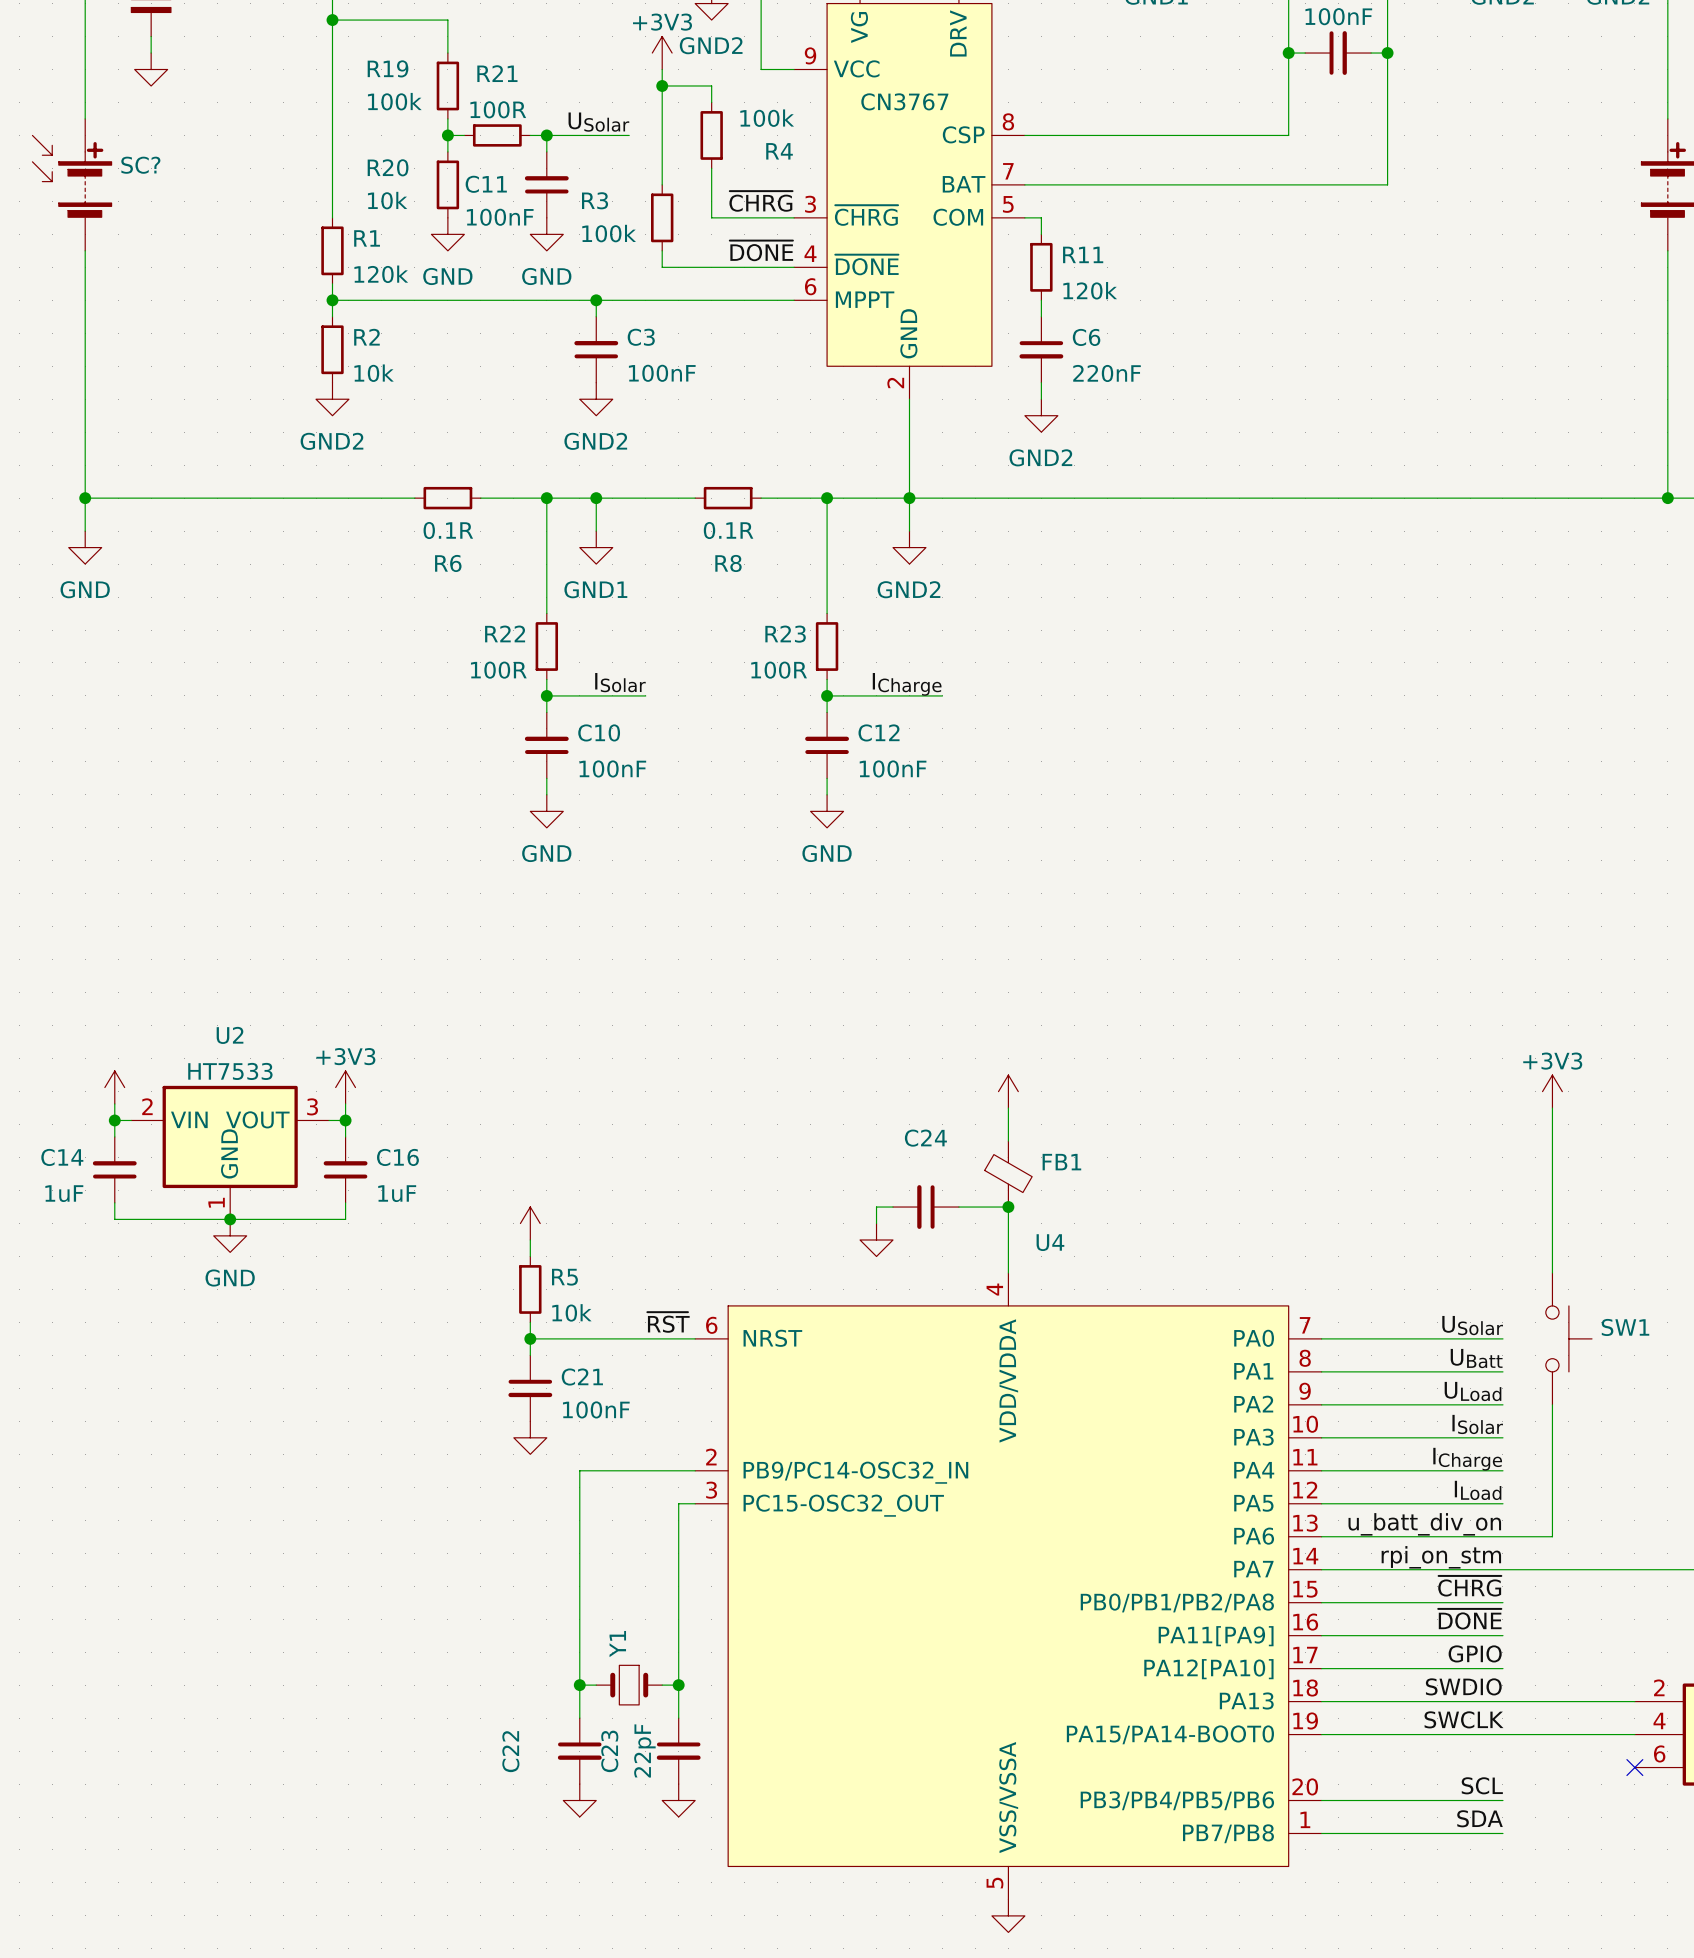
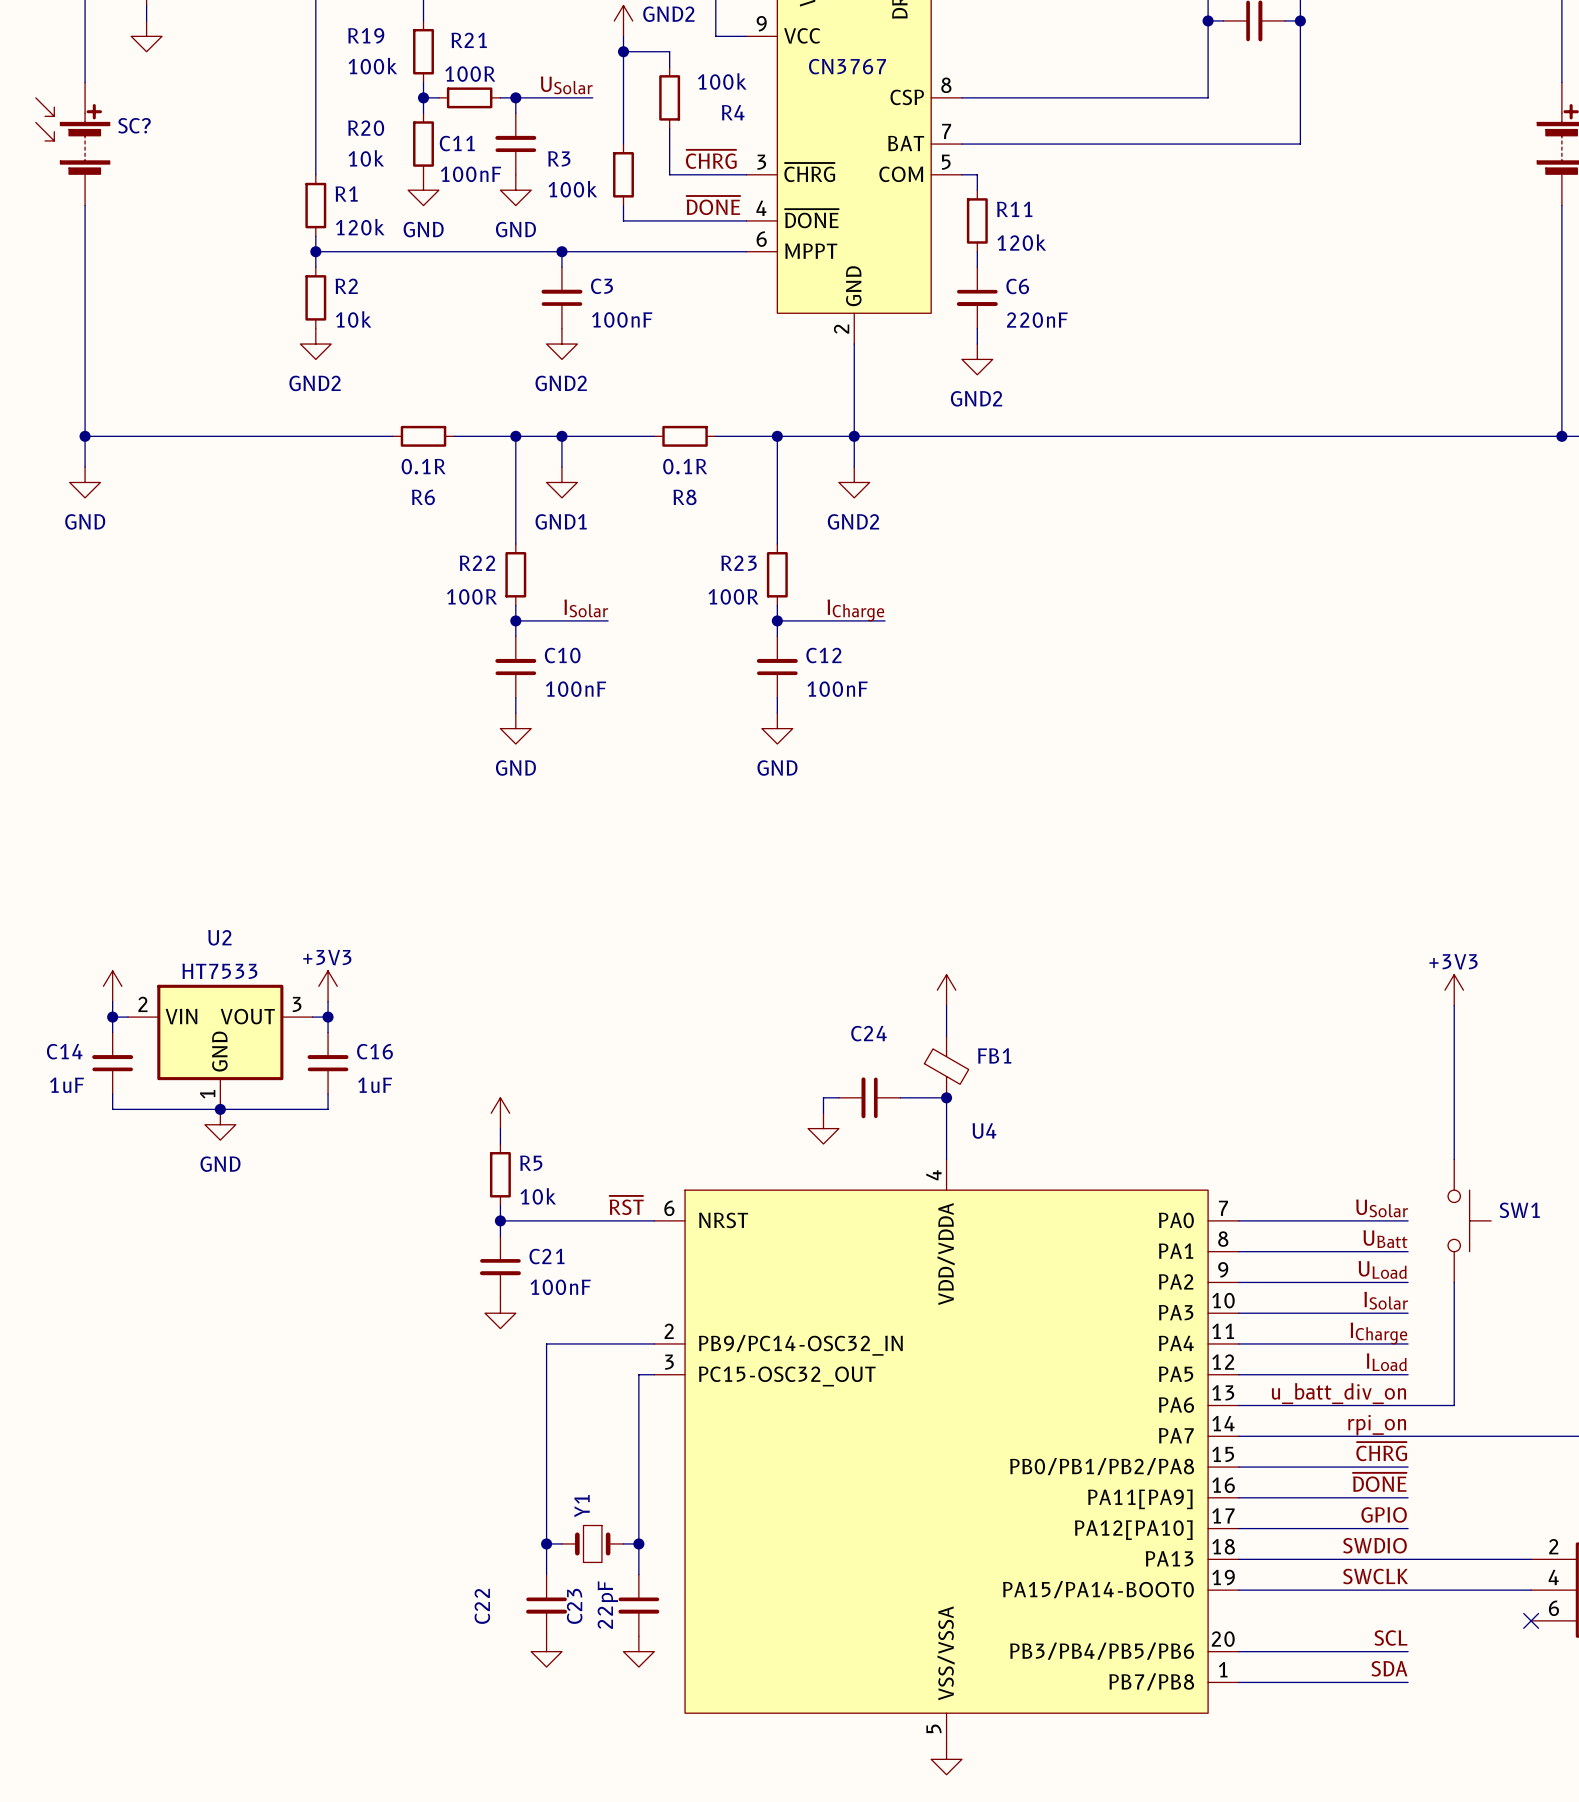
label: rpi_on_stm (1441, 1557) -> rpi_on (1377, 1425)

